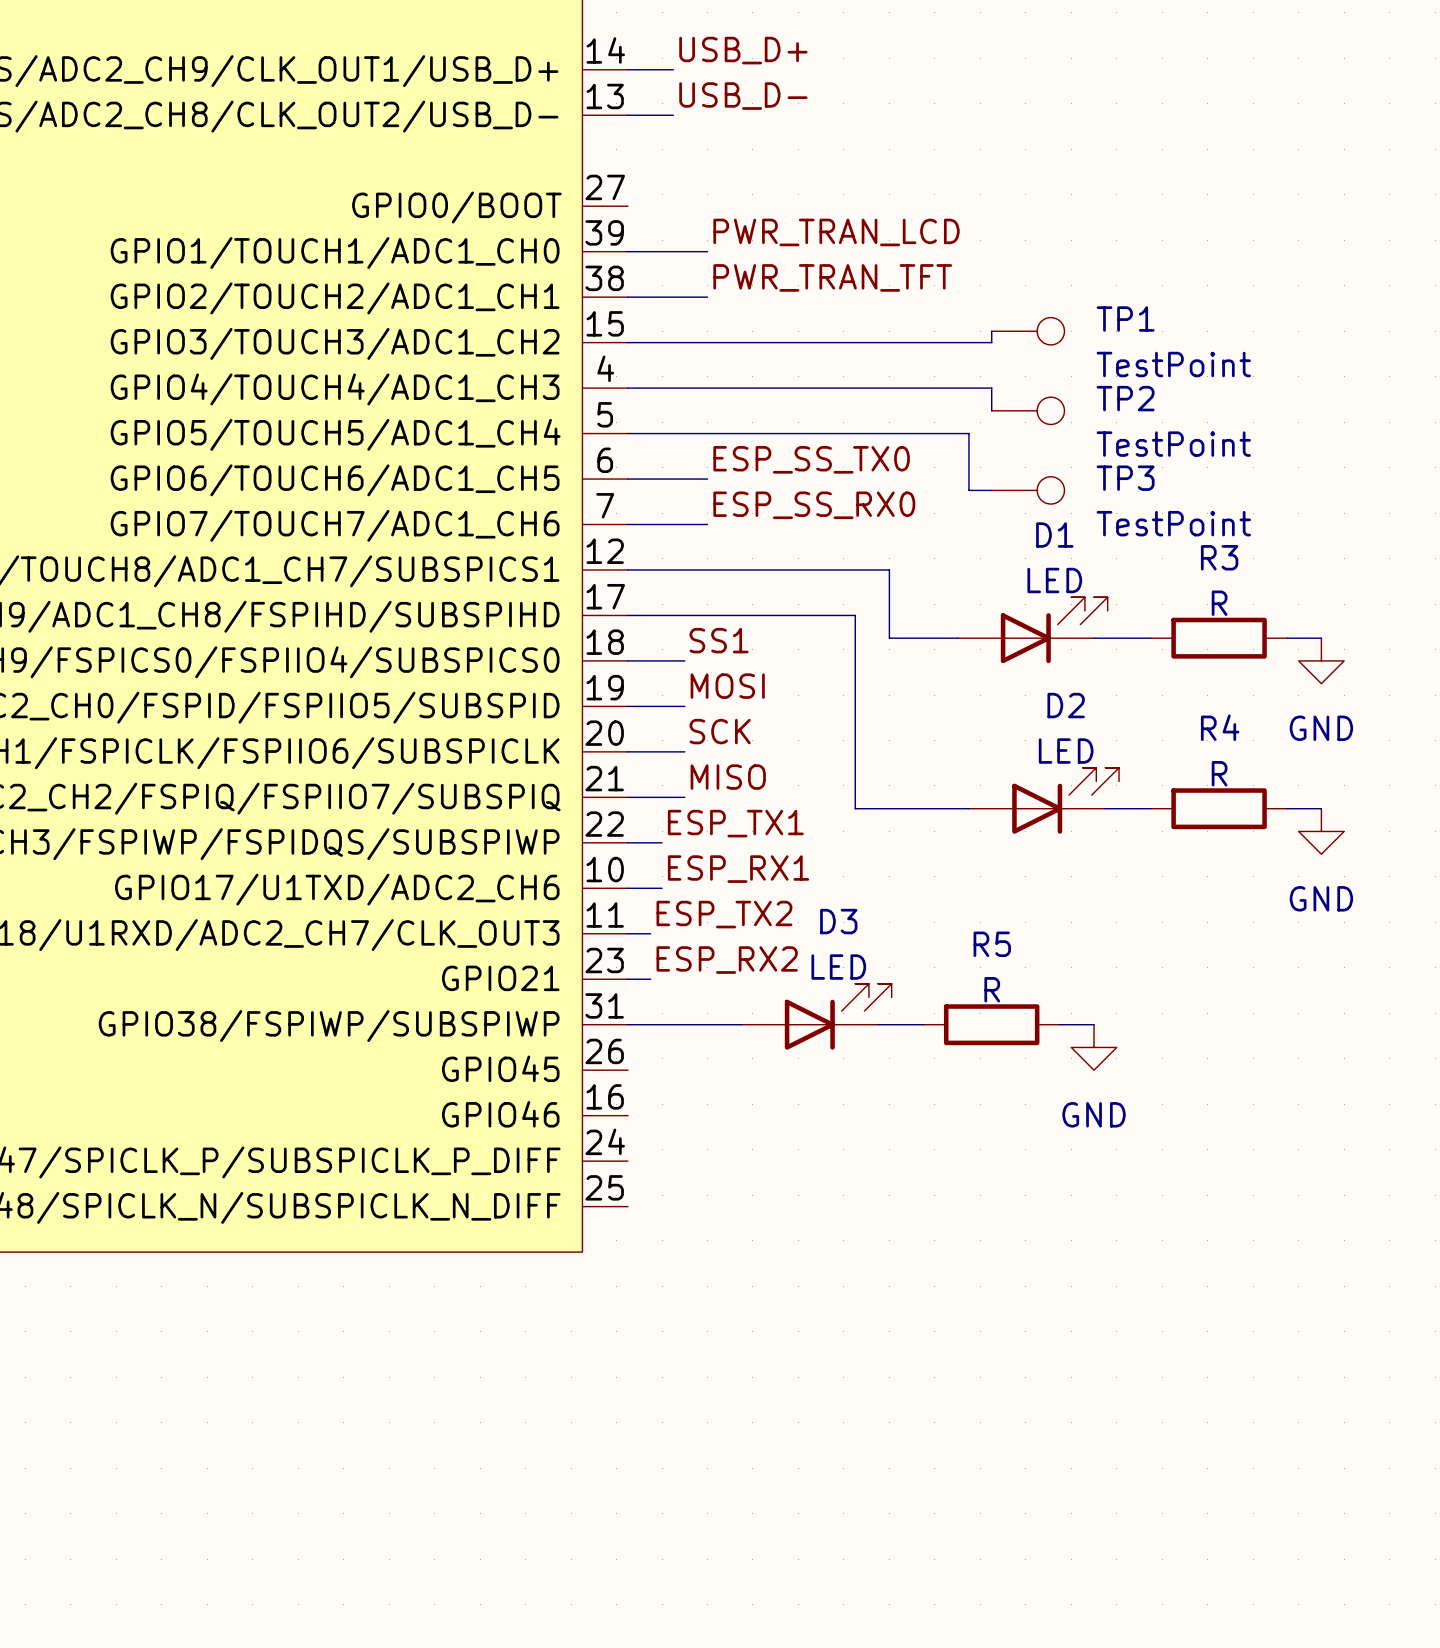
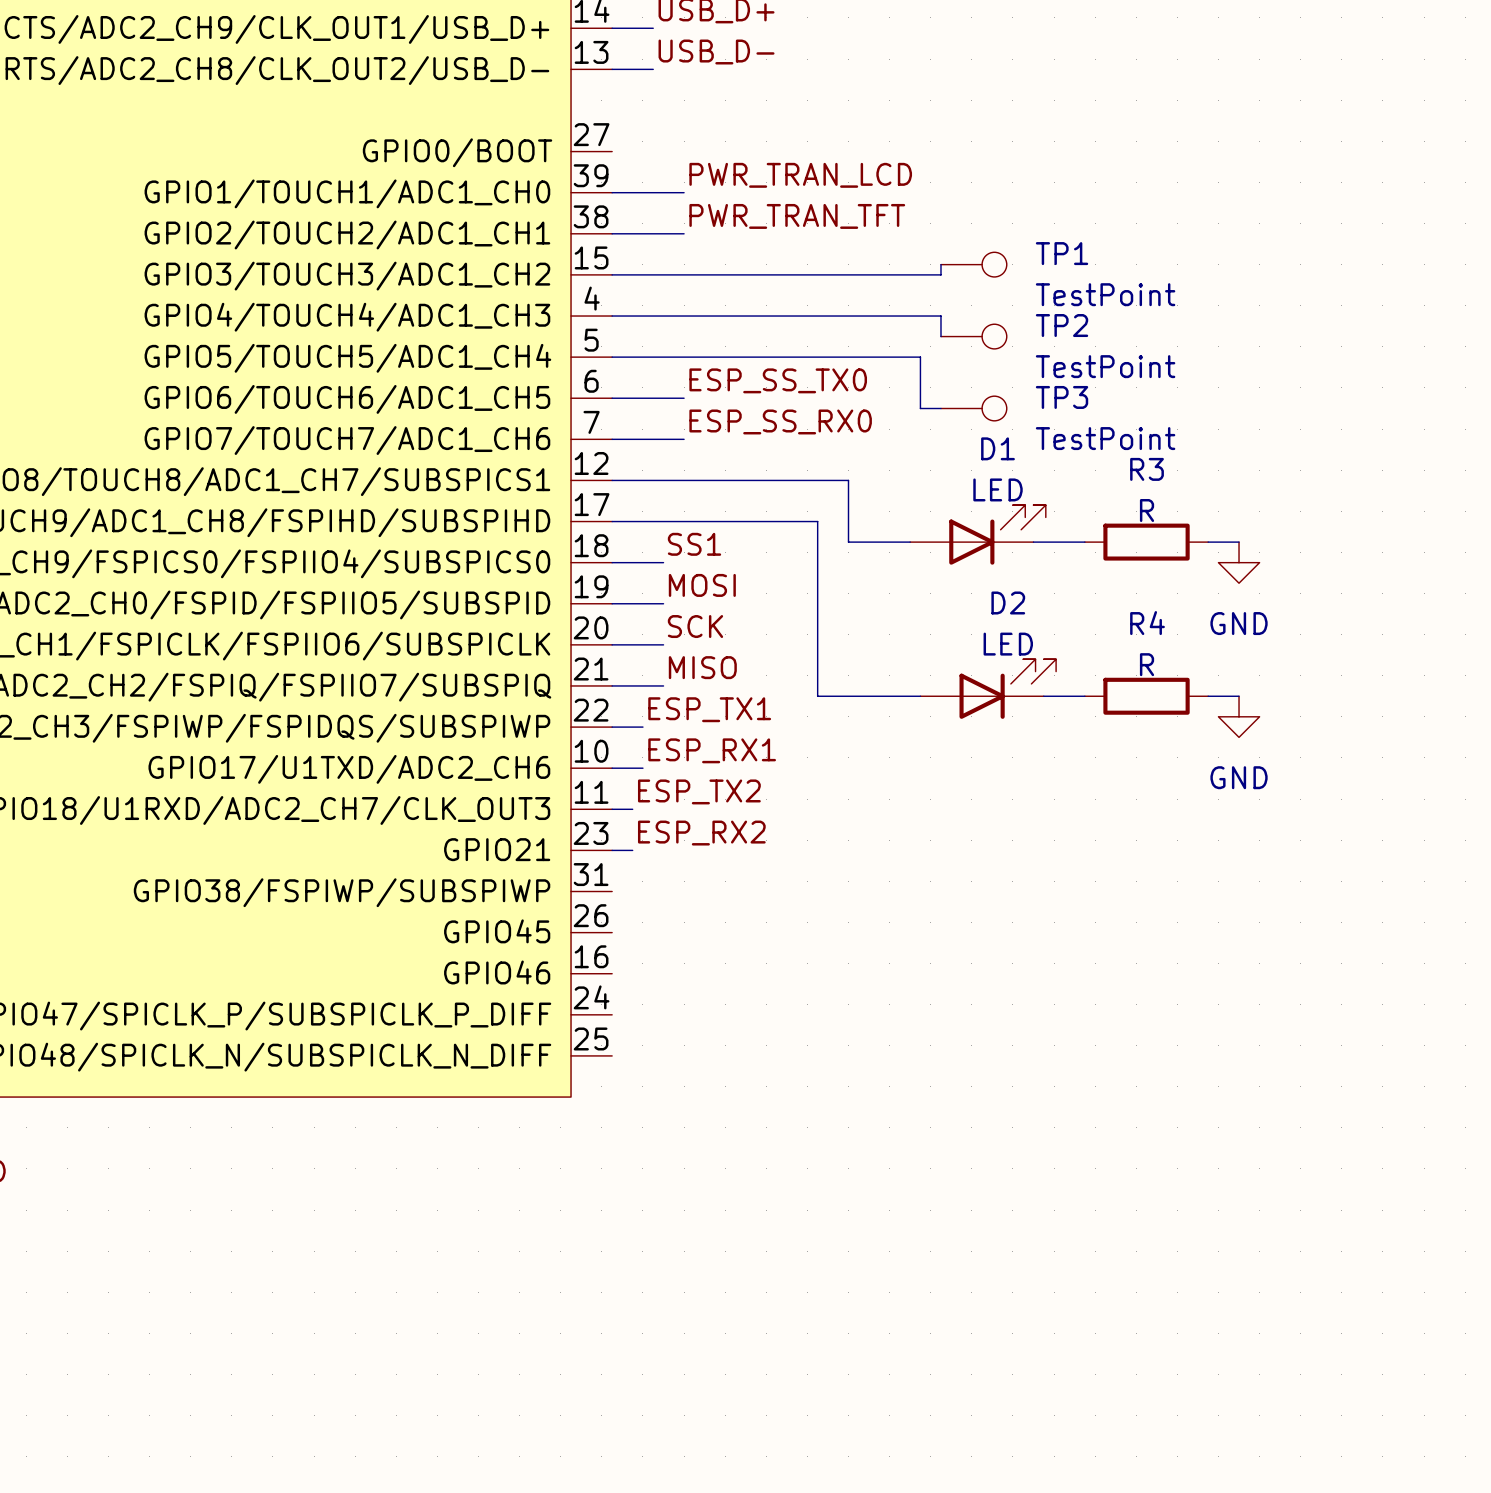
D3: LED (816, 1016) -> none
wire: (627, 1024) (741, 1024) -> none
wire: (878, 1024) (923, 1024) -> none
R5: R (991, 1024) -> none
wire: (1059, 1024) (1094, 1024) -> none
power symbol: GND (1094, 1047) -> none

